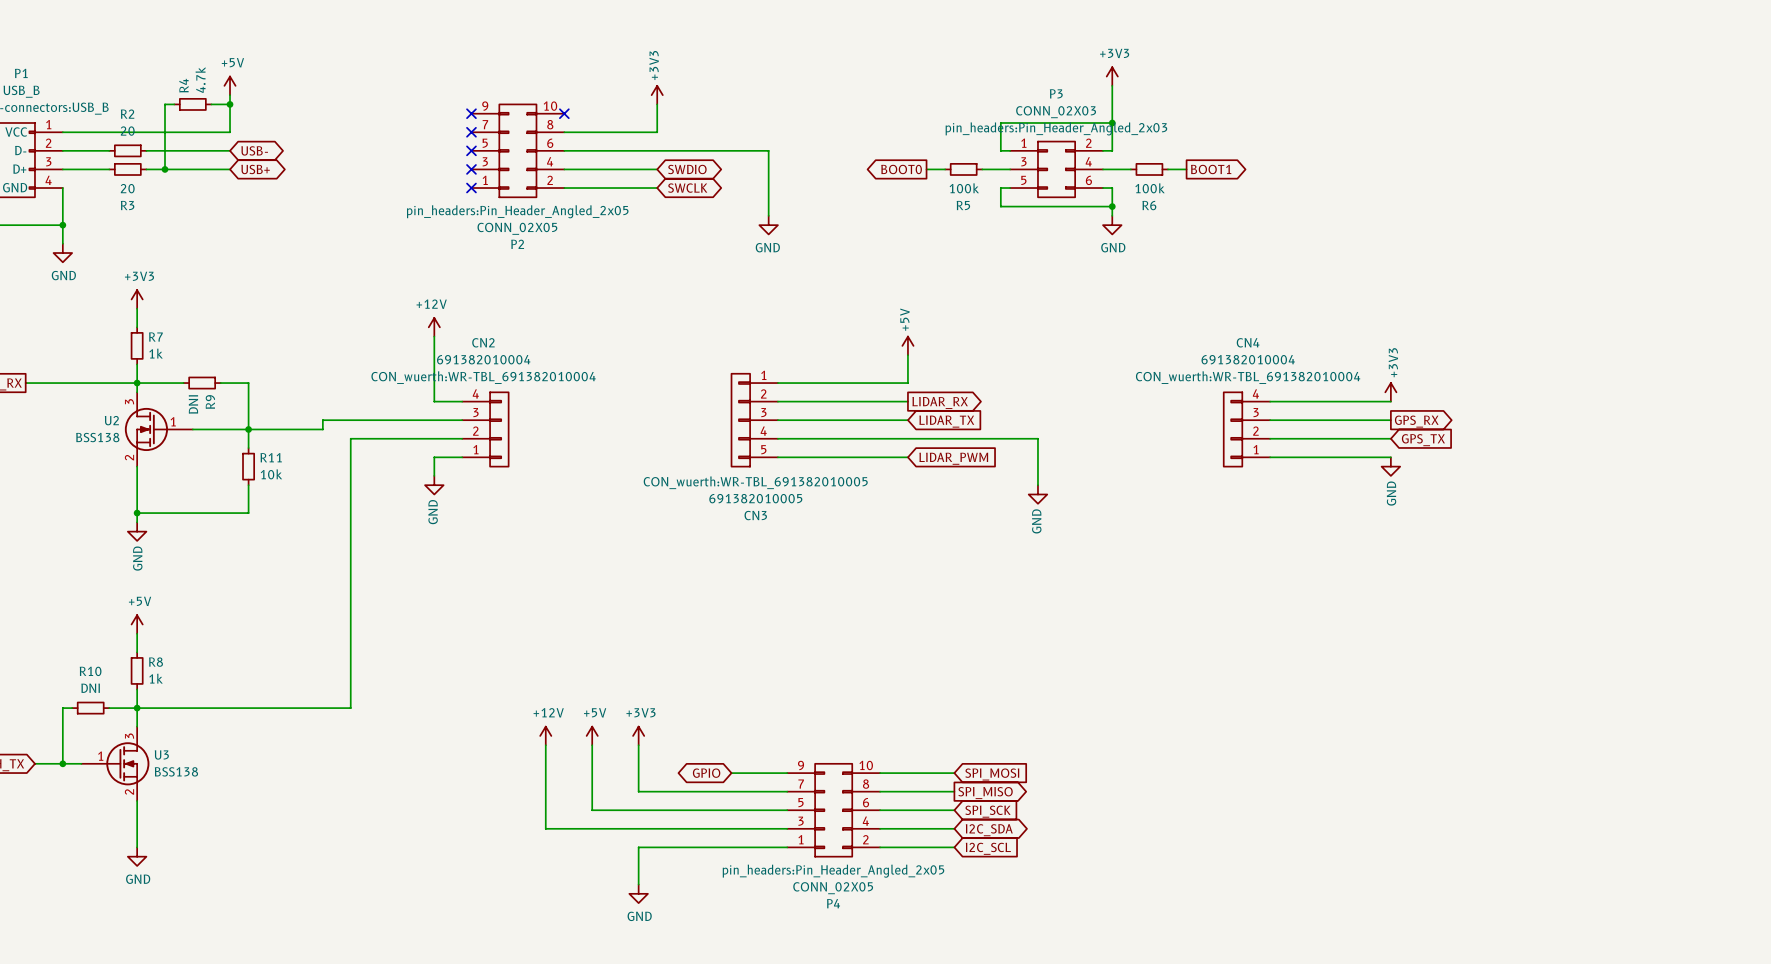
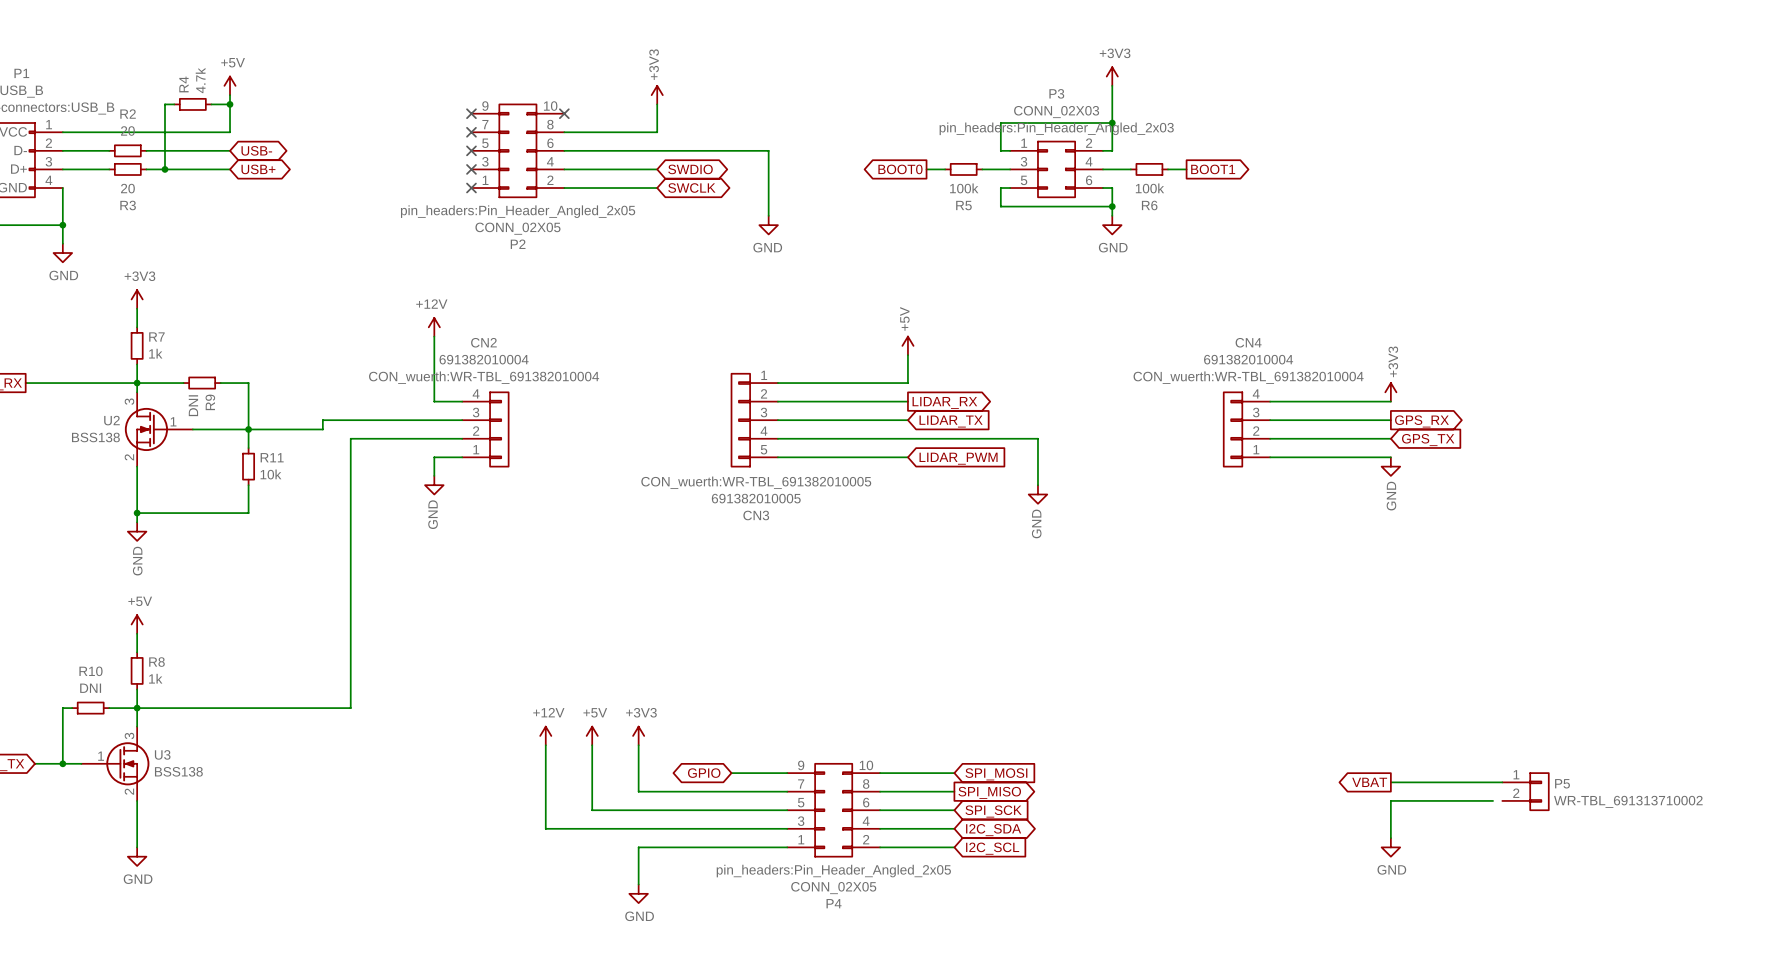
global label: none -> VBAT (1369, 782)
wire: none -> (1390, 782) (1502, 782)
P5: none -> WR-TBL_691313710002 (1525, 791)
wire: none -> (1493, 800) (1390, 800) (1390, 838)
power symbol: none -> GND (1390, 847)

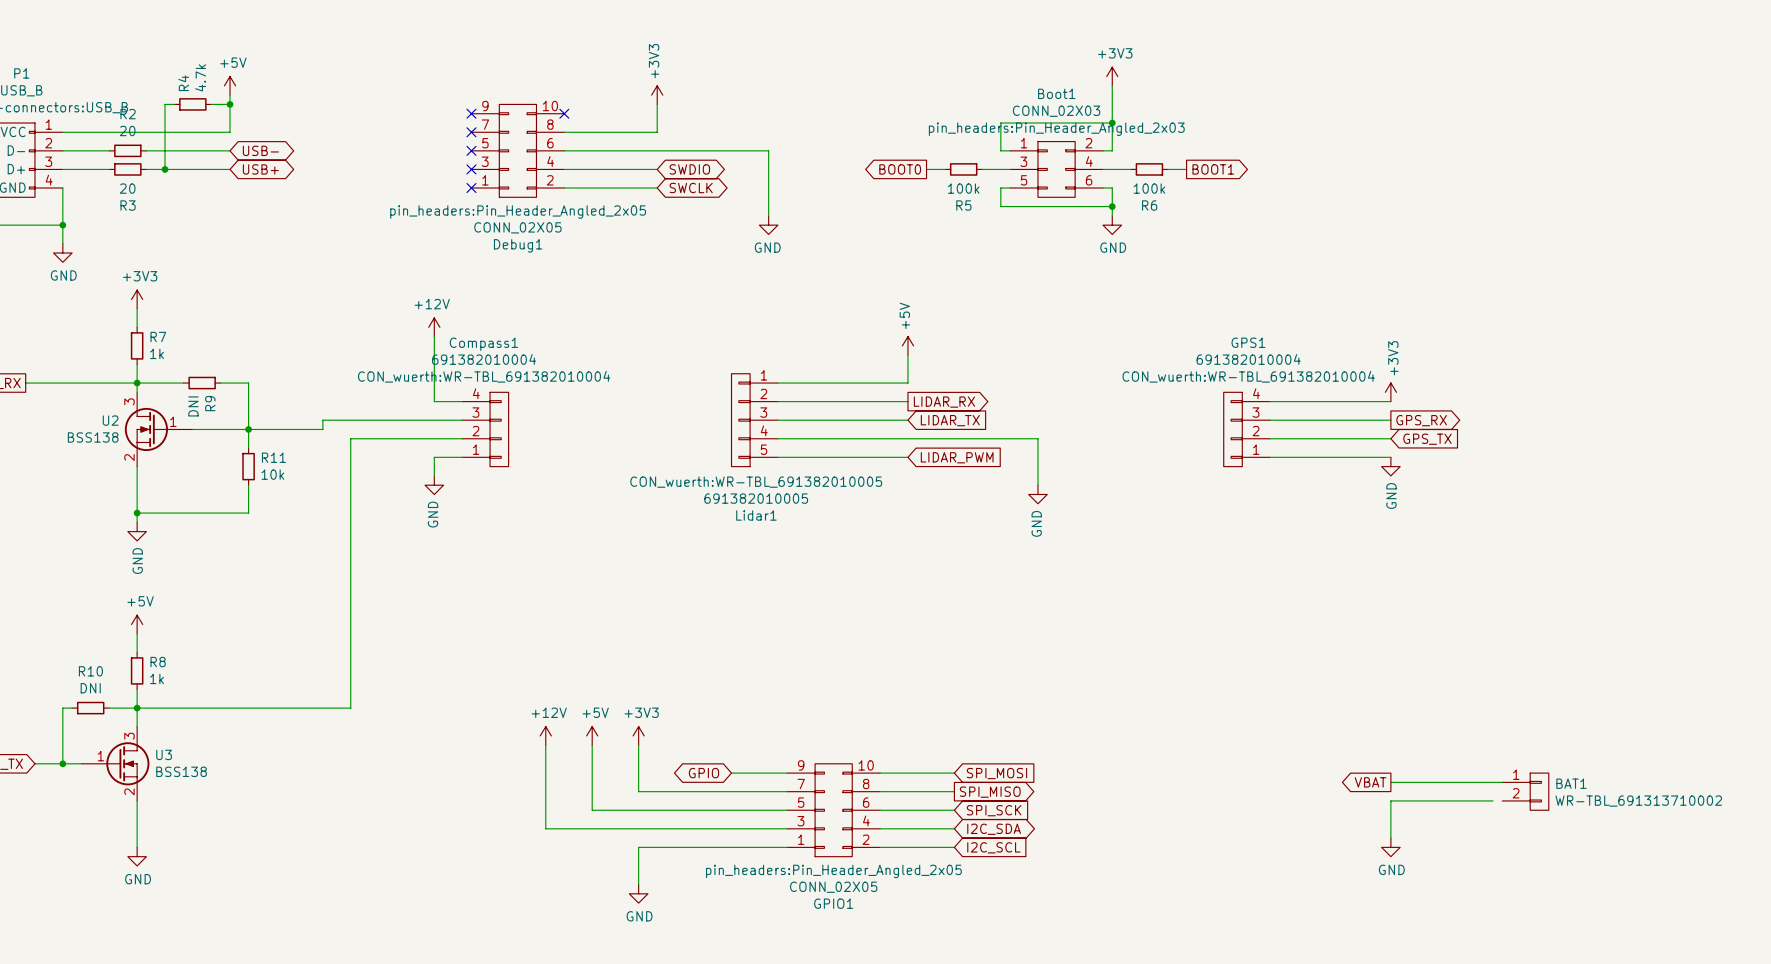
P3 name: P3 (1056, 93) -> Boot1 (1056, 93)
P2 name: P2 (518, 244) -> Debug1 (518, 245)
CN2 name: CN2 (483, 342) -> Compass1 (483, 344)
CN4 name: CN4 (1248, 342) -> GPS1 (1248, 342)
CN3 name: CN3 (756, 515) -> Lidar1 (756, 515)
P5 name: P5 (1562, 783) -> BAT1 (1571, 783)
P4 name: P4 (834, 903) -> GPIO1 (833, 903)

